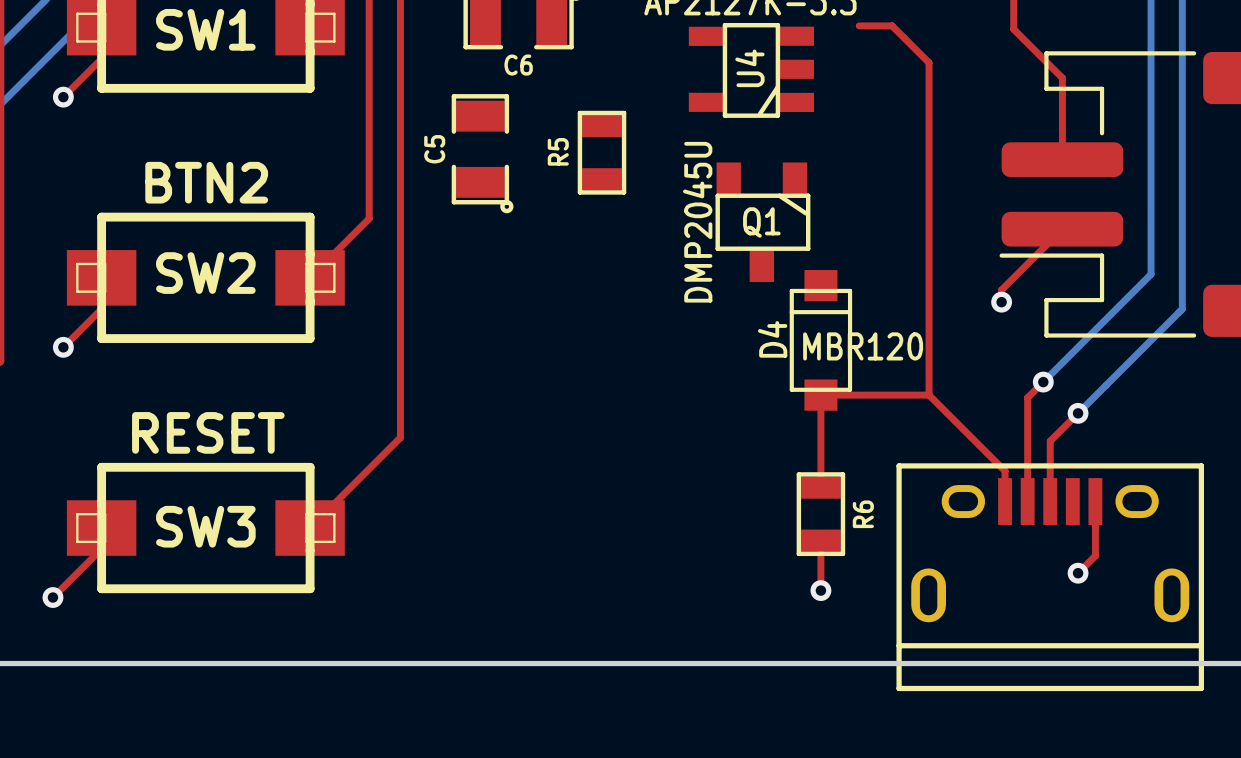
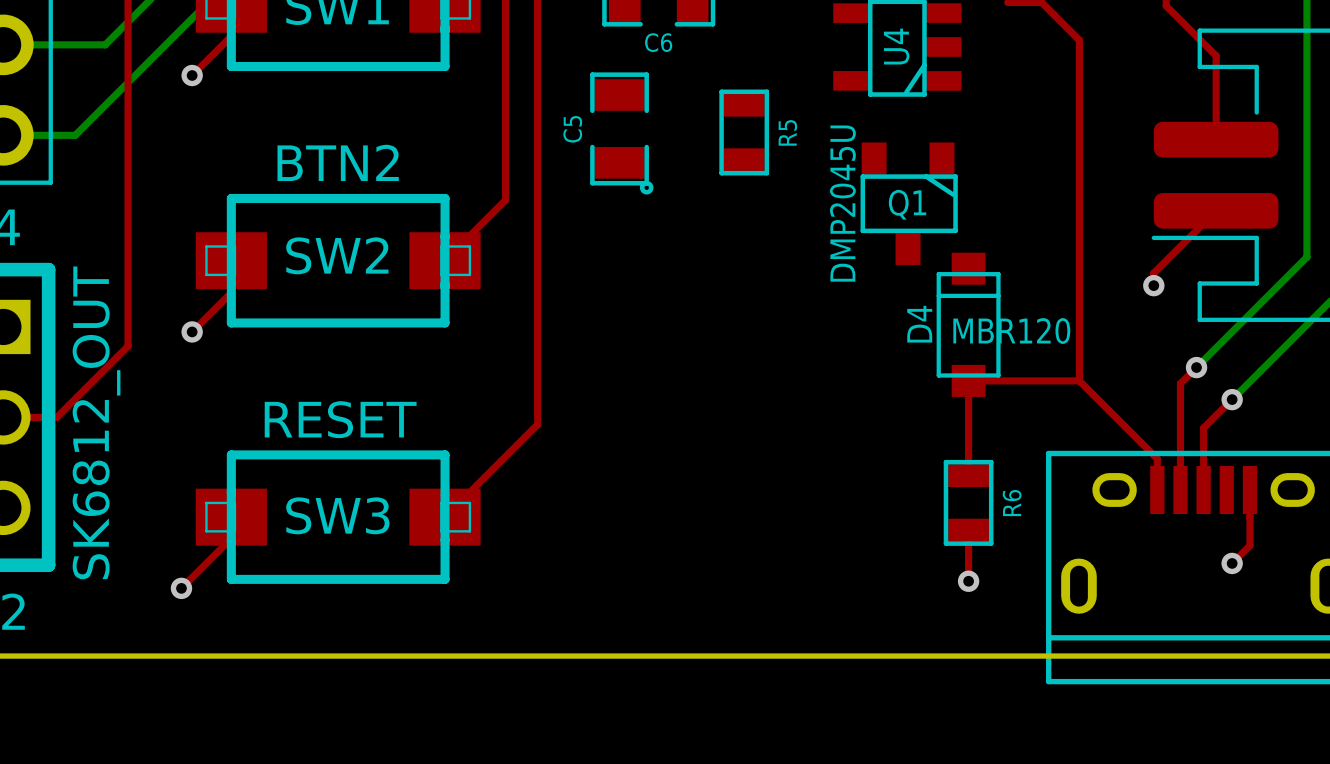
R5 name position: R5 (558, 151) -> R5 (787, 132)

